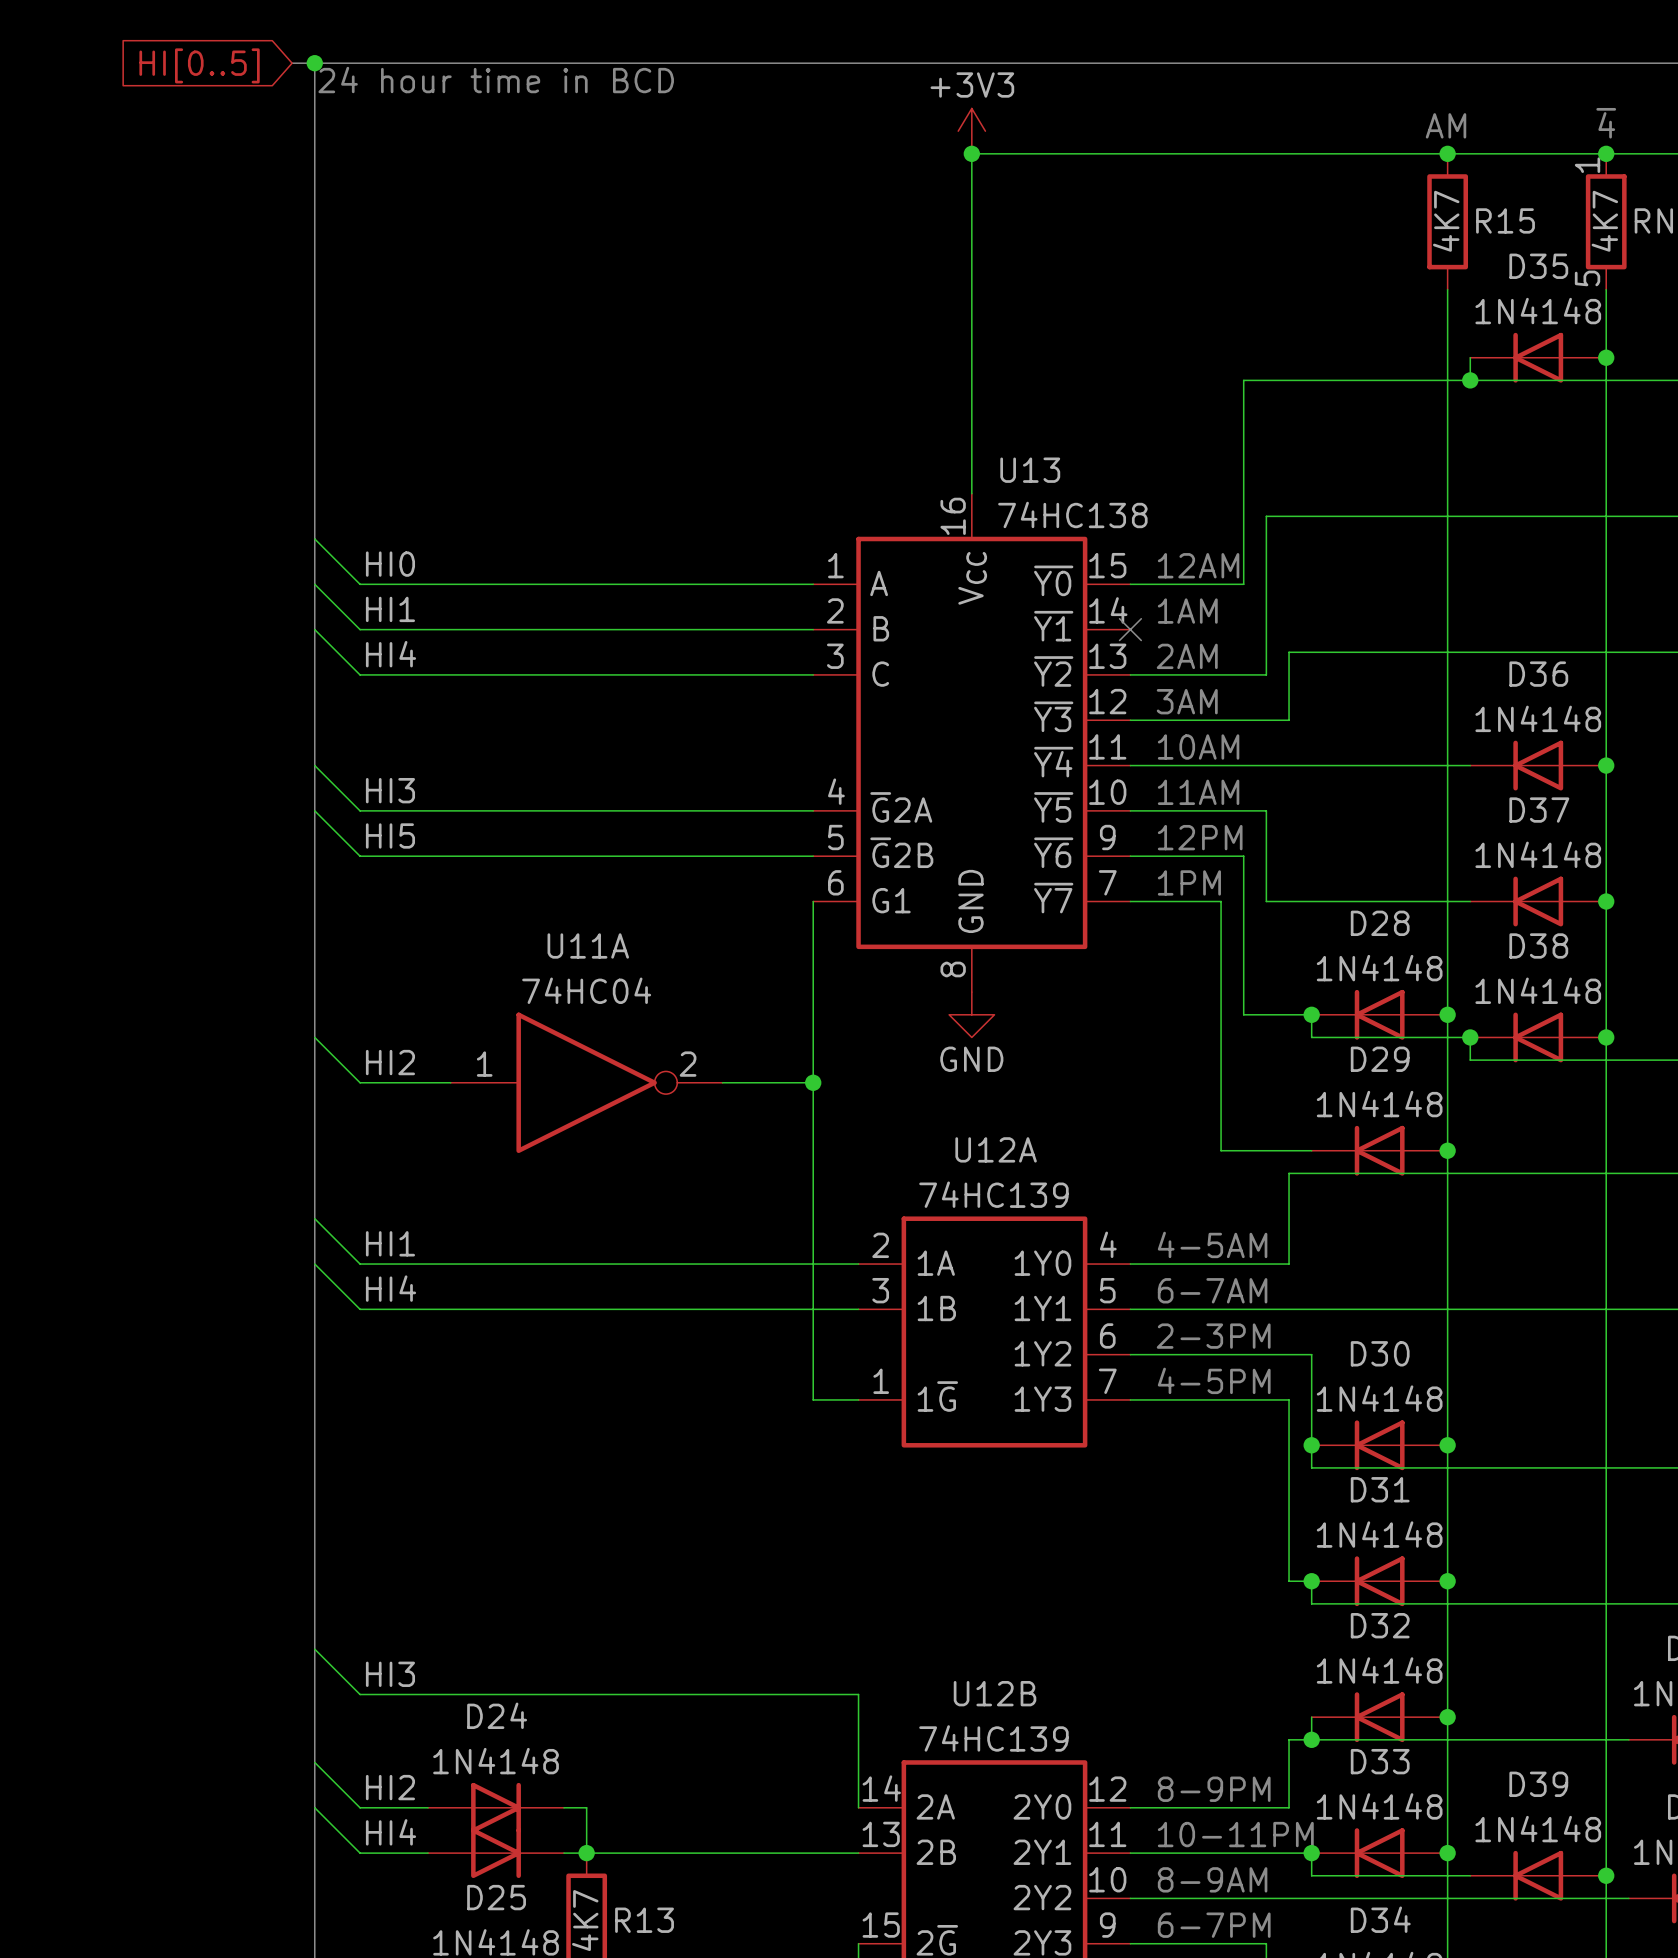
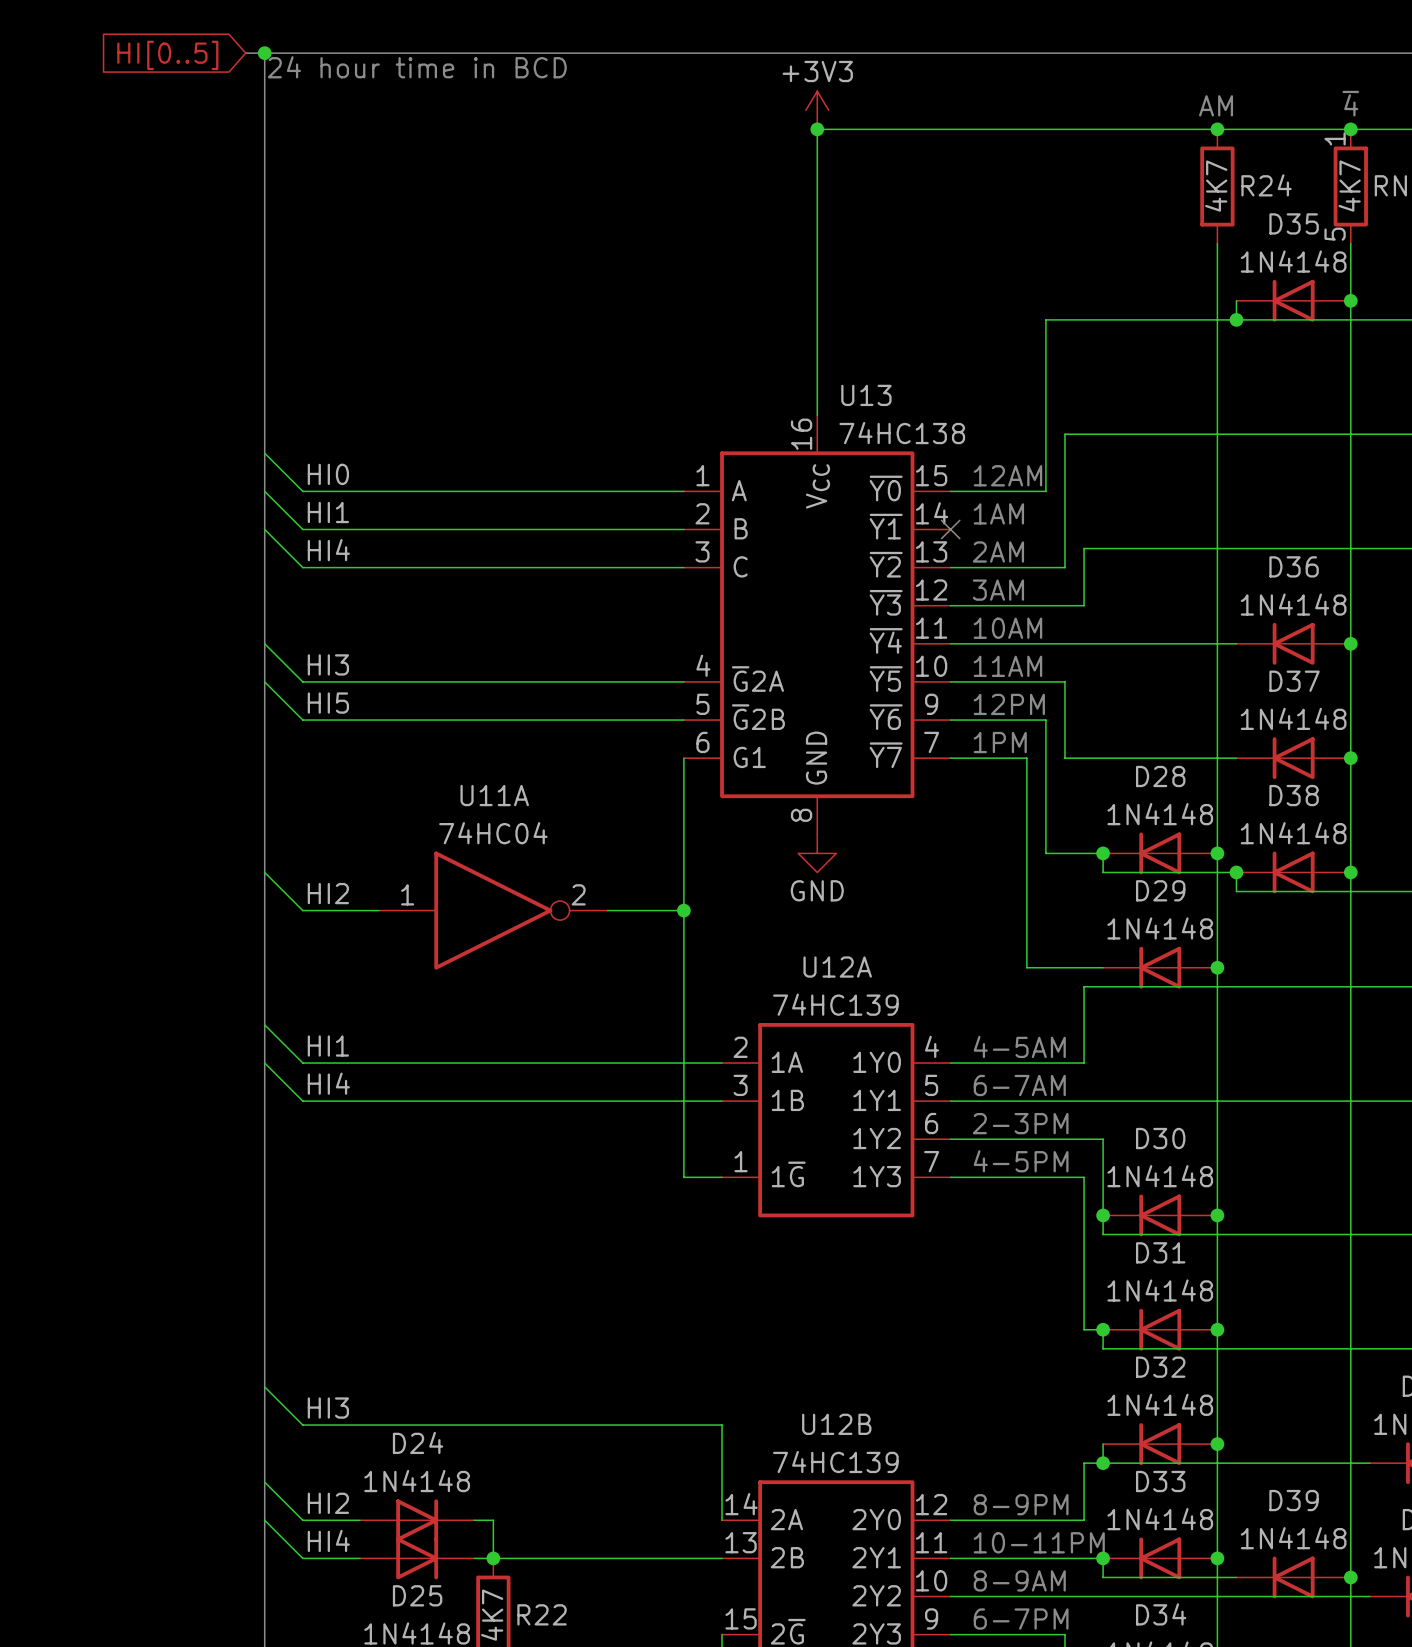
R15 name: R15 (1505, 220) -> R24 (1266, 185)
R13 name: R13 (644, 1920) -> R22 (542, 1614)

